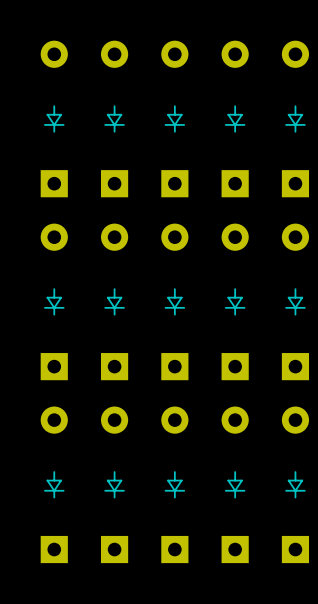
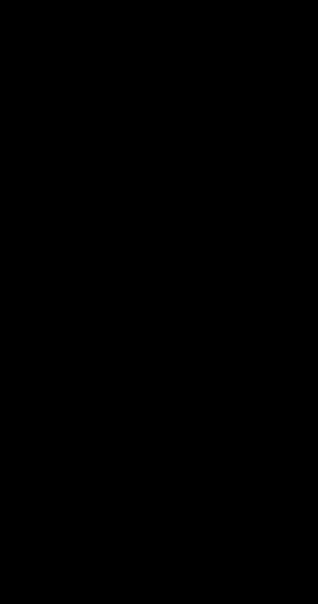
part: (54, 118) -> none
part: (114, 118) -> none
part: (174, 118) -> none
part: (235, 118) -> none
part: (295, 118) -> none
part: (54, 301) -> none
part: (114, 301) -> none
part: (174, 301) -> none
part: (235, 301) -> none
part: (295, 301) -> none
part: (54, 484) -> none
part: (114, 484) -> none
part: (174, 484) -> none
part: (235, 484) -> none
part: (295, 484) -> none

